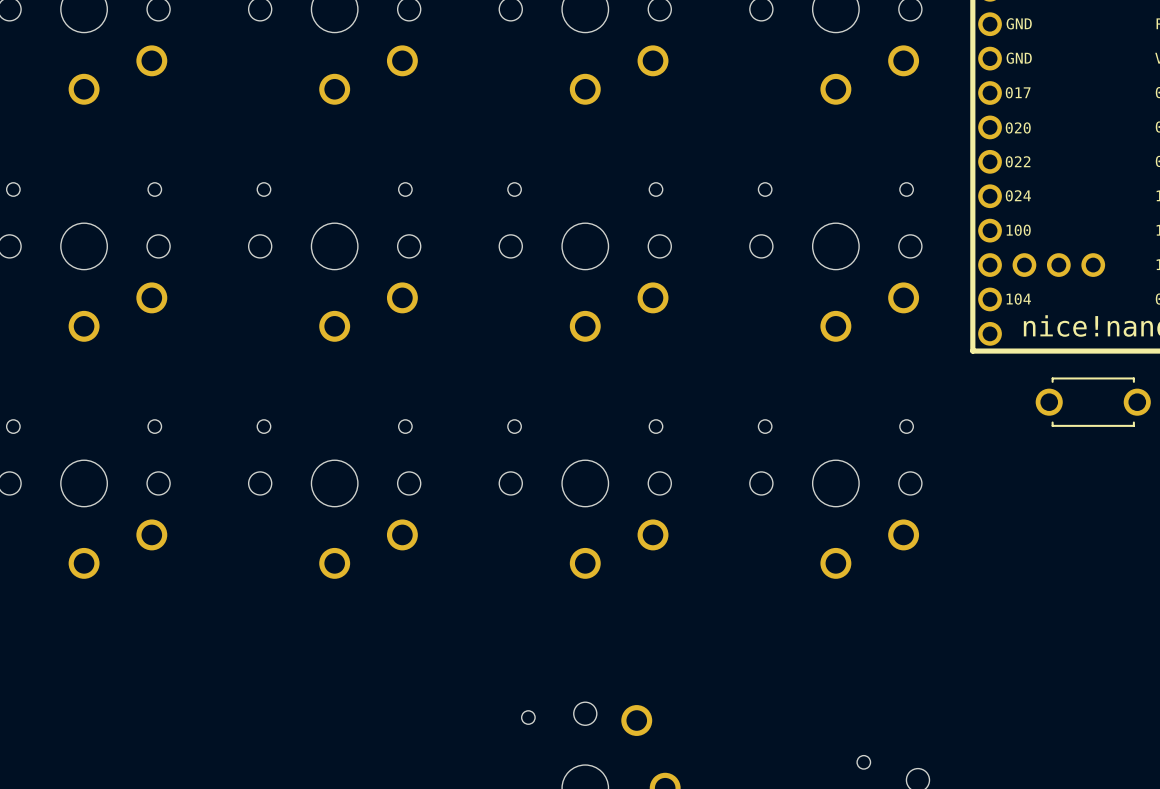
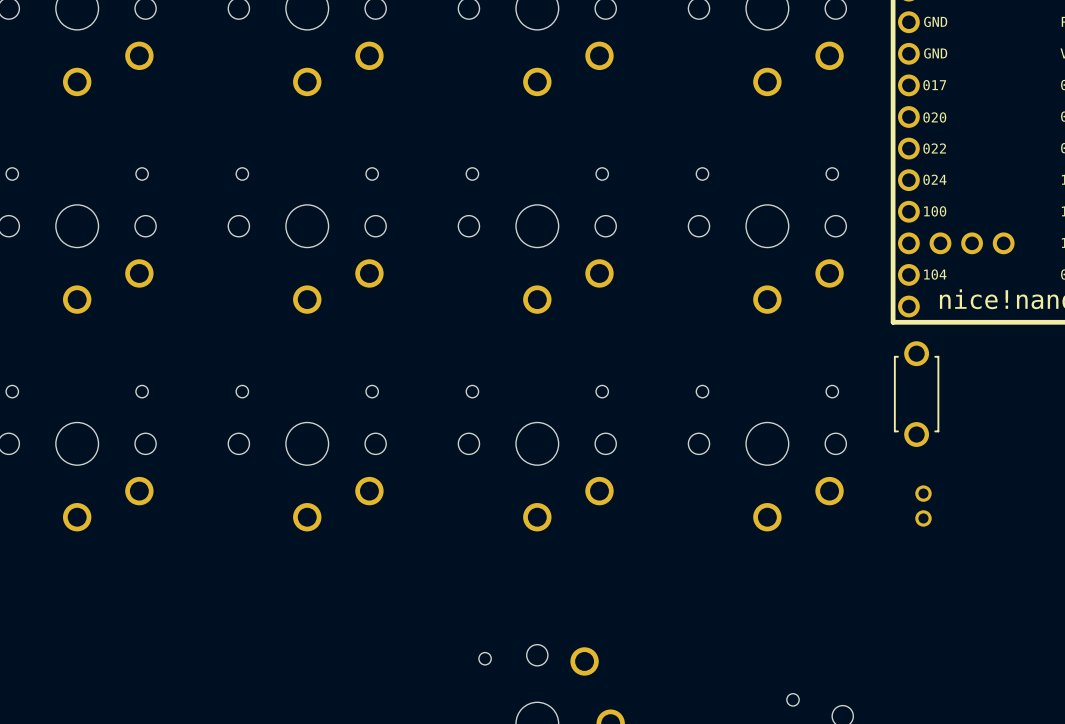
part rotation: 0° (1093, 402) -> 90° clockwise (916, 394)
part position: (1093, 402) -> (916, 394)
part: none -> (923, 506)

